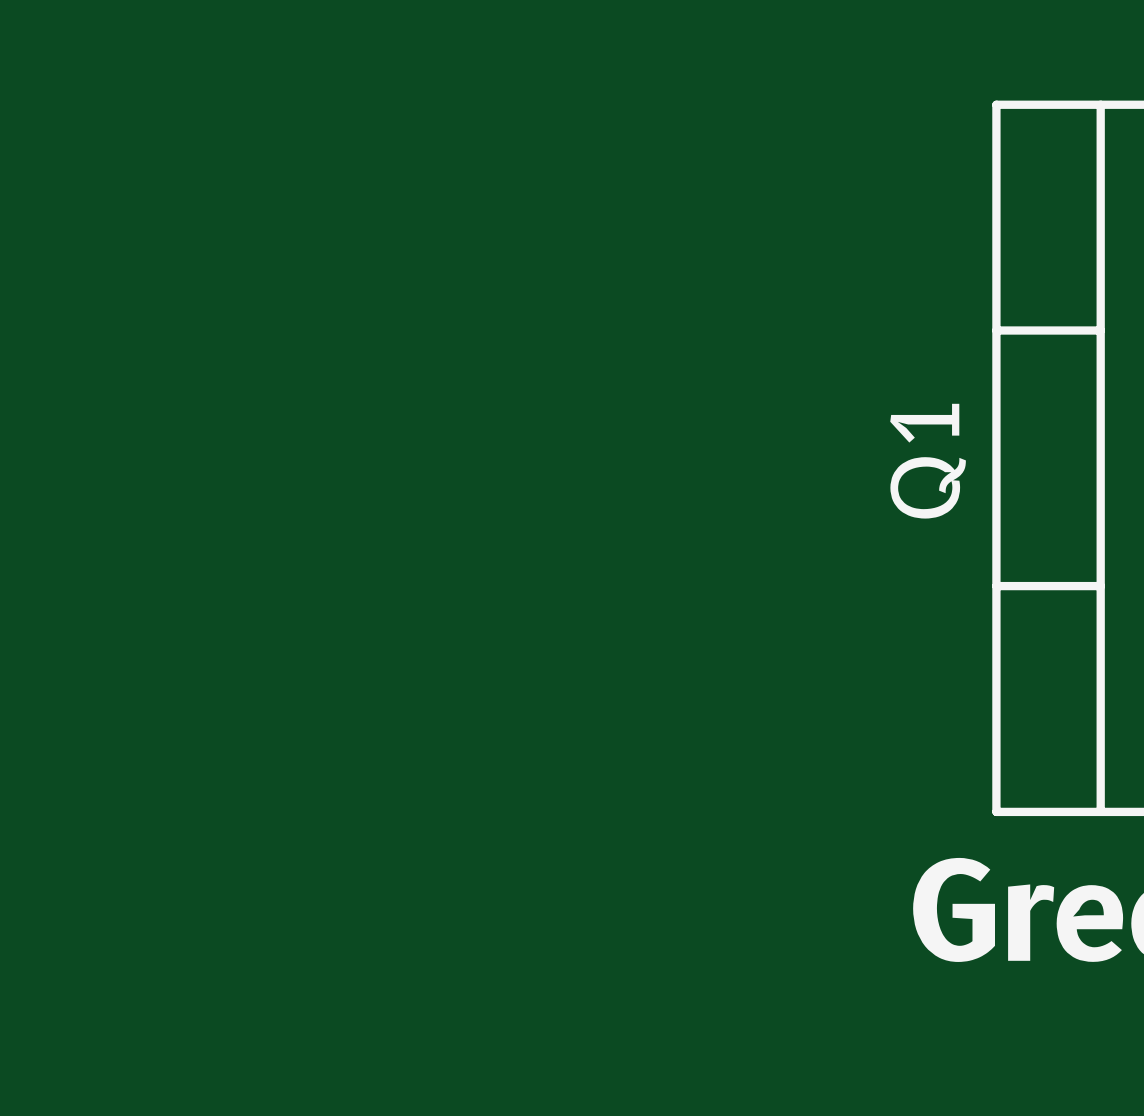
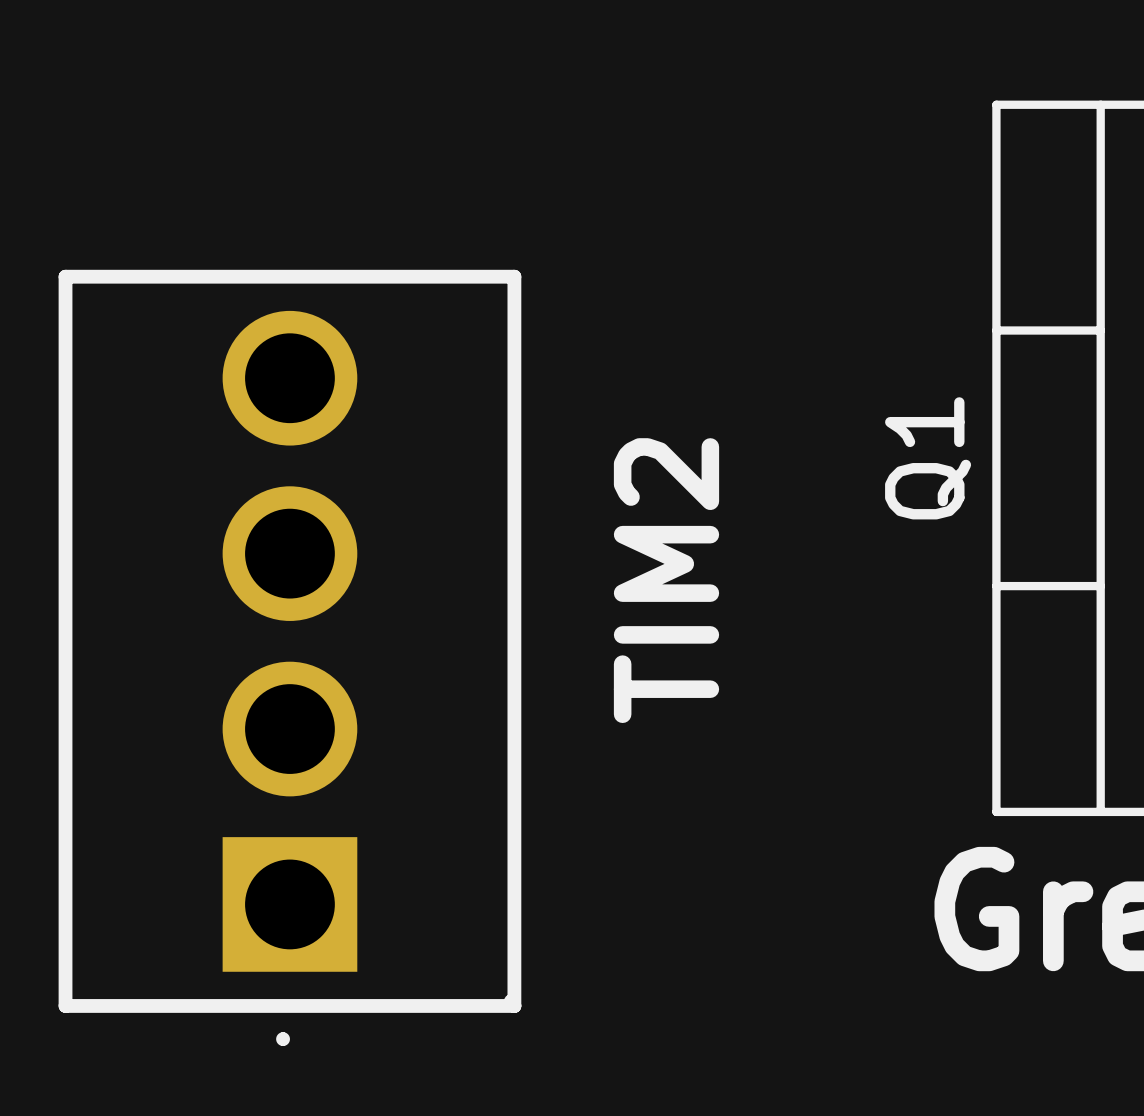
text: none -> TIM2 (666, 580)
part: none -> (289, 657)

